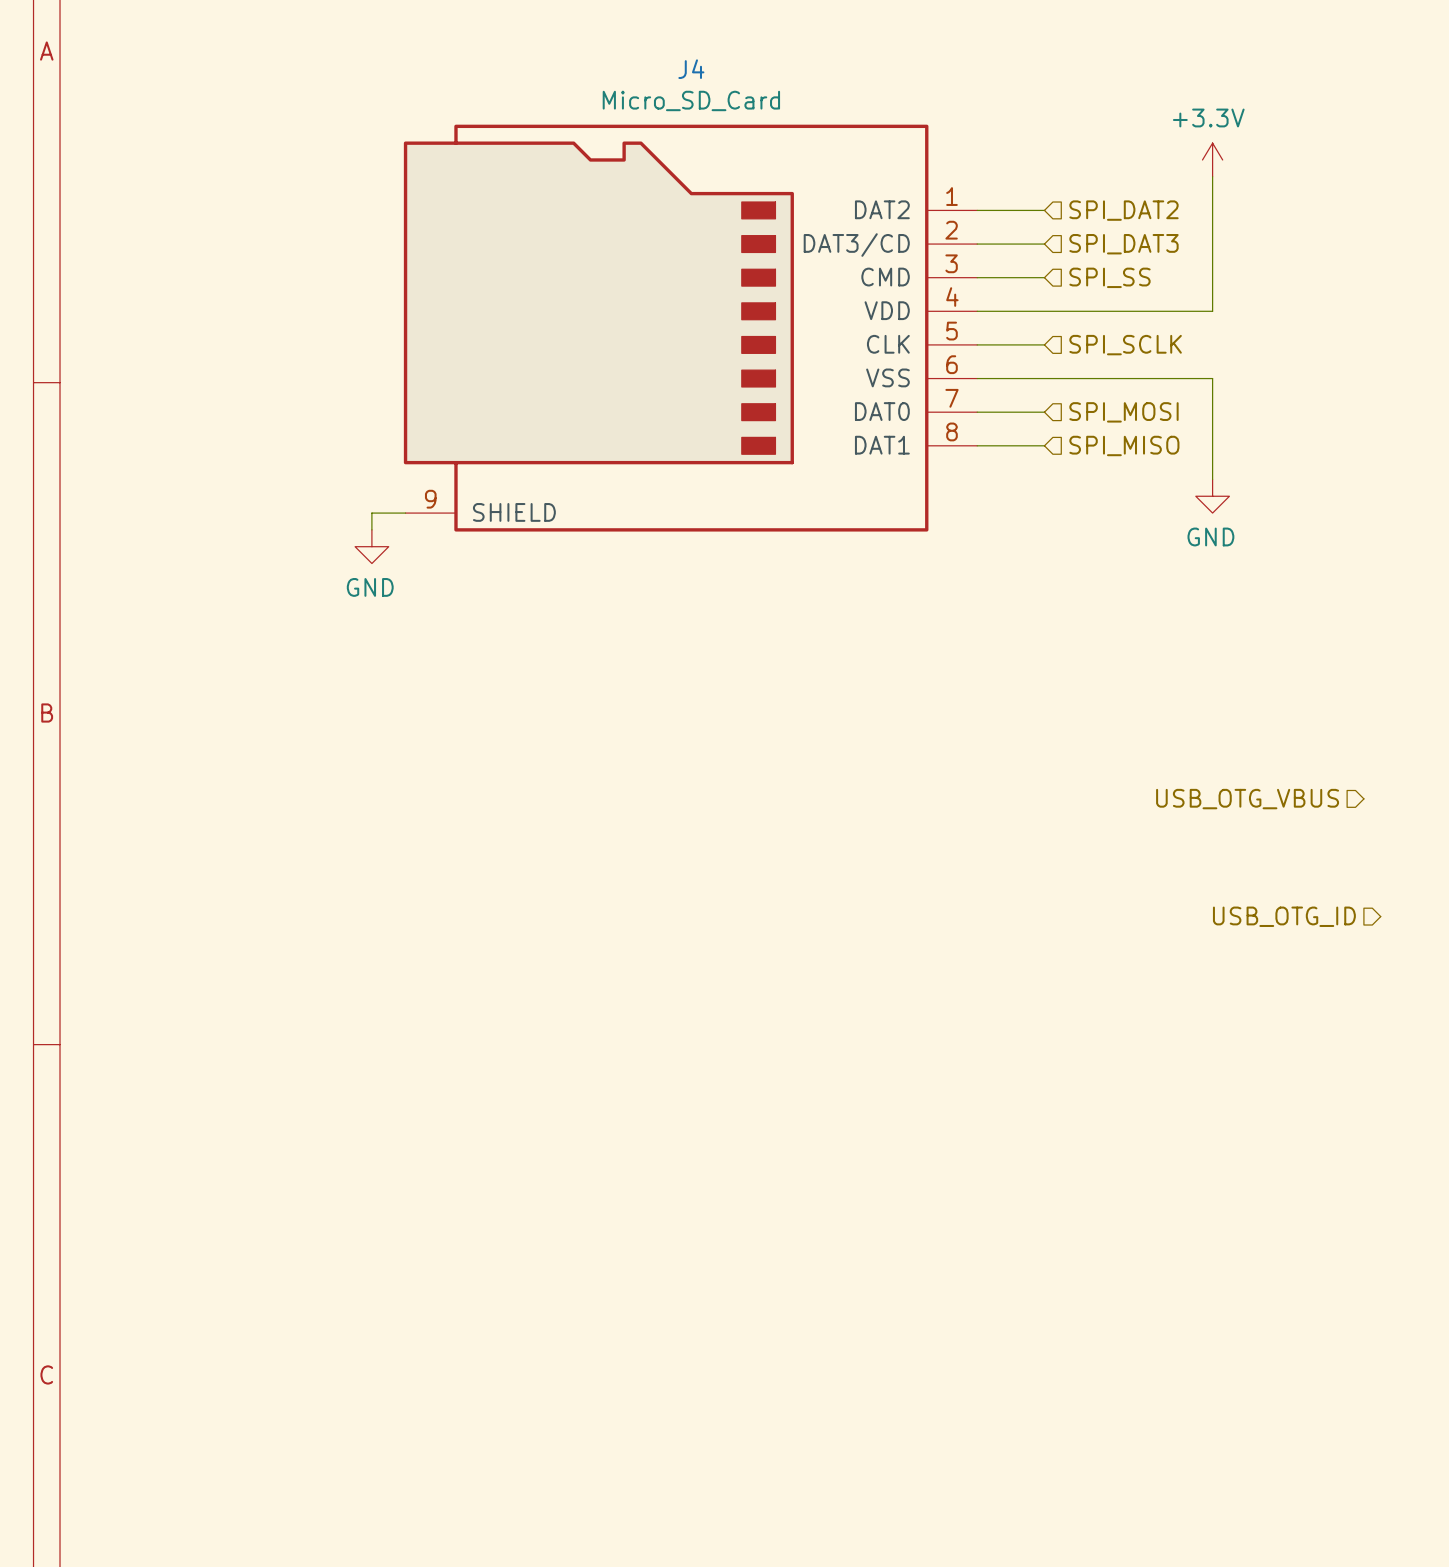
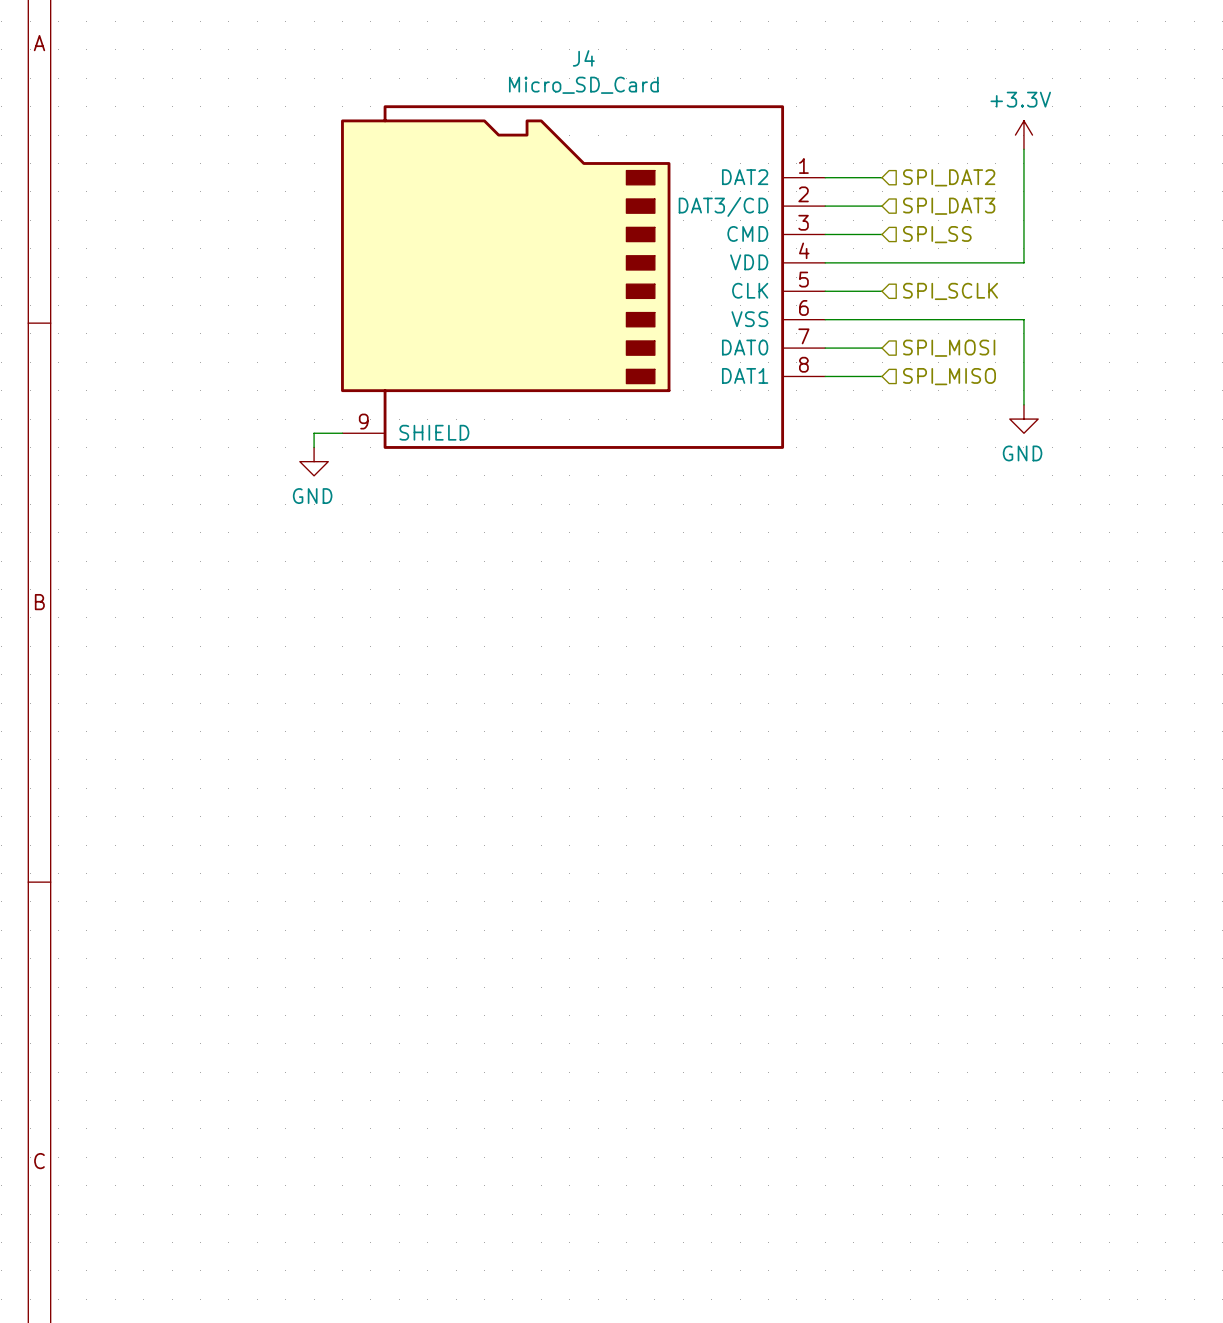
hierarchical label: USB_OTG_VBUS (1247, 799) -> none
hierarchical label: USB_OTG_ID (1284, 916) -> none

